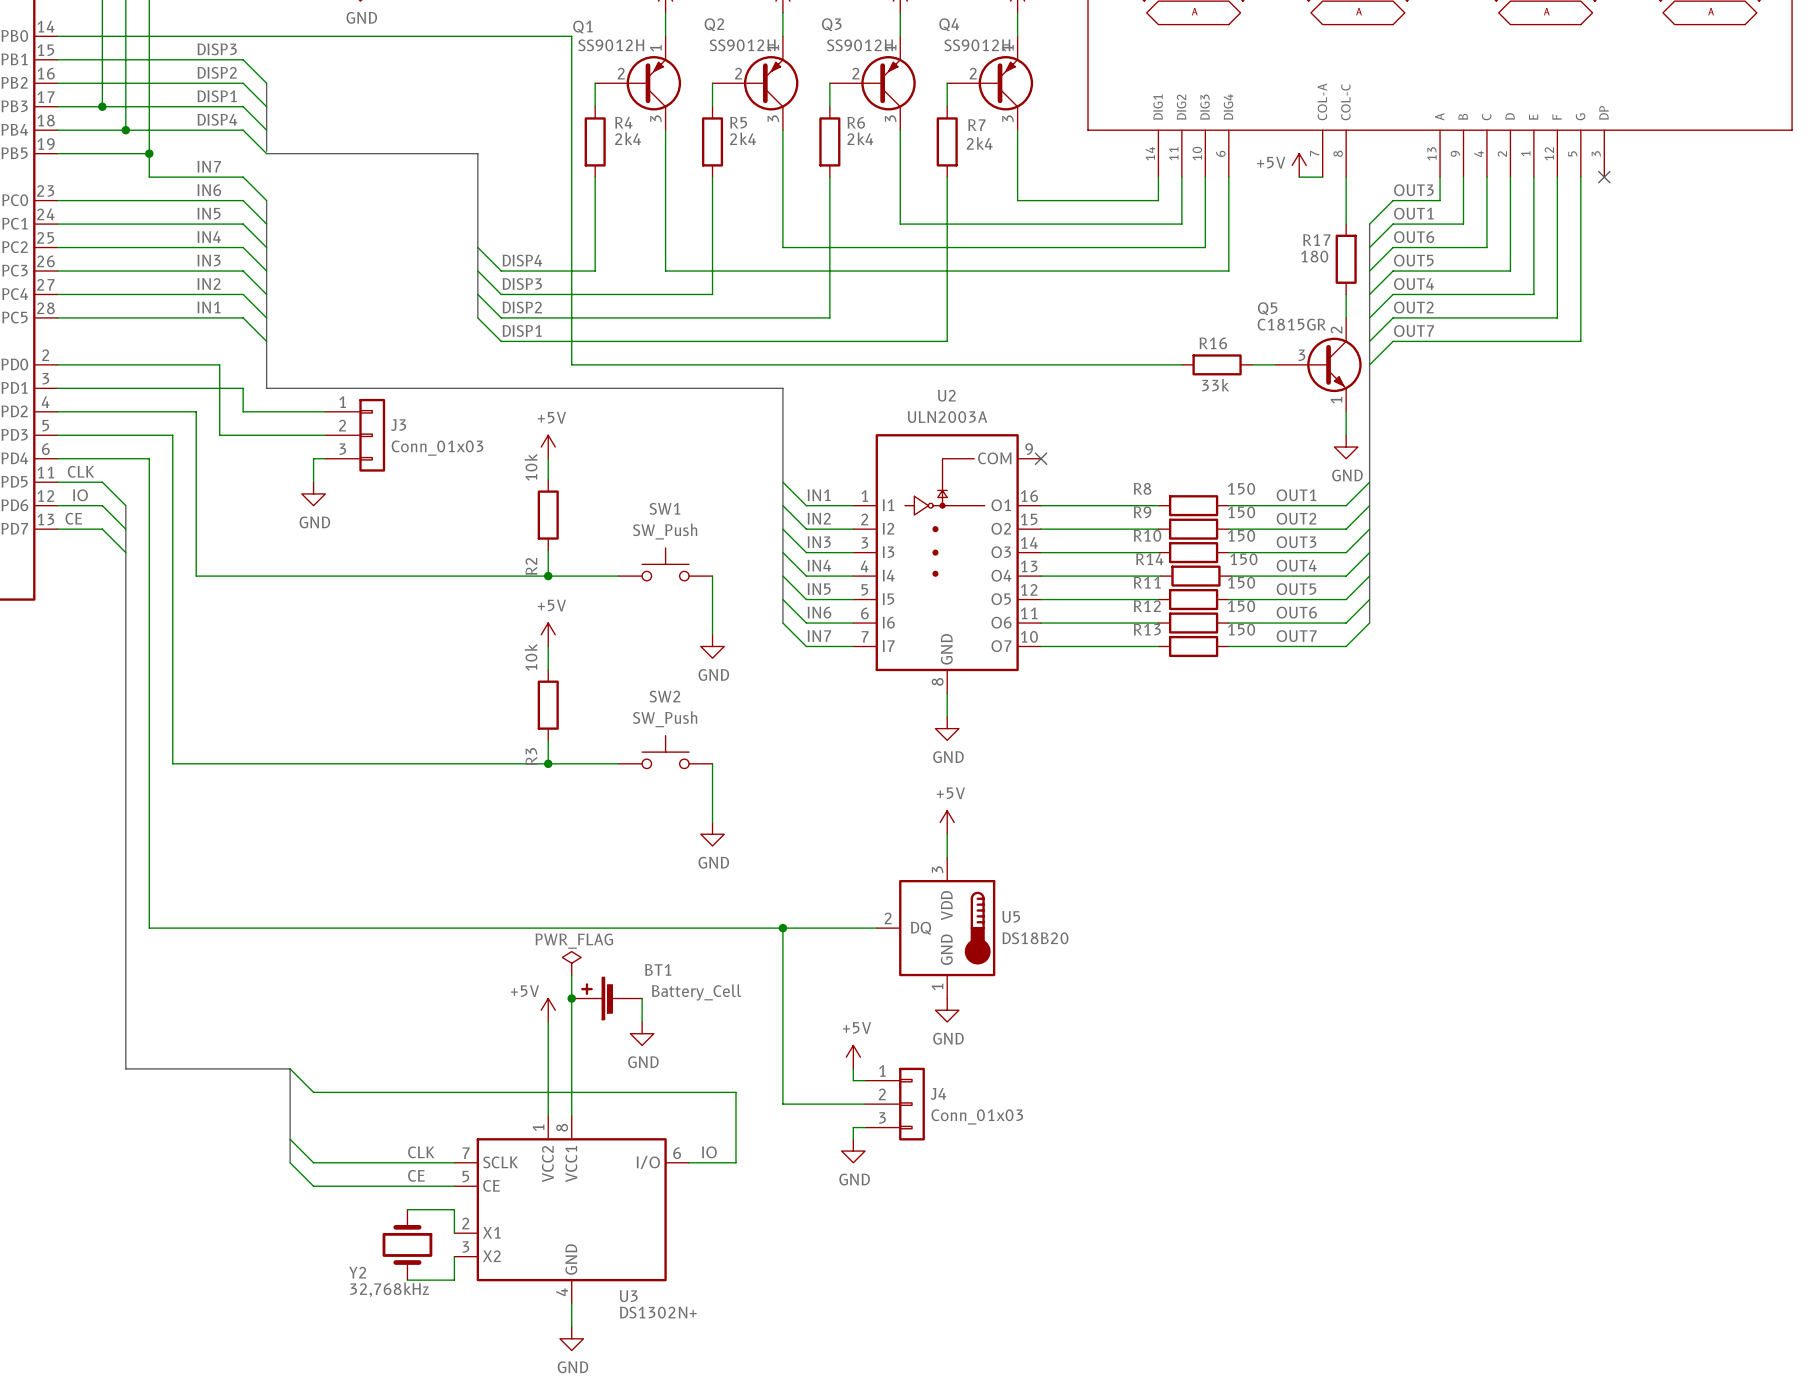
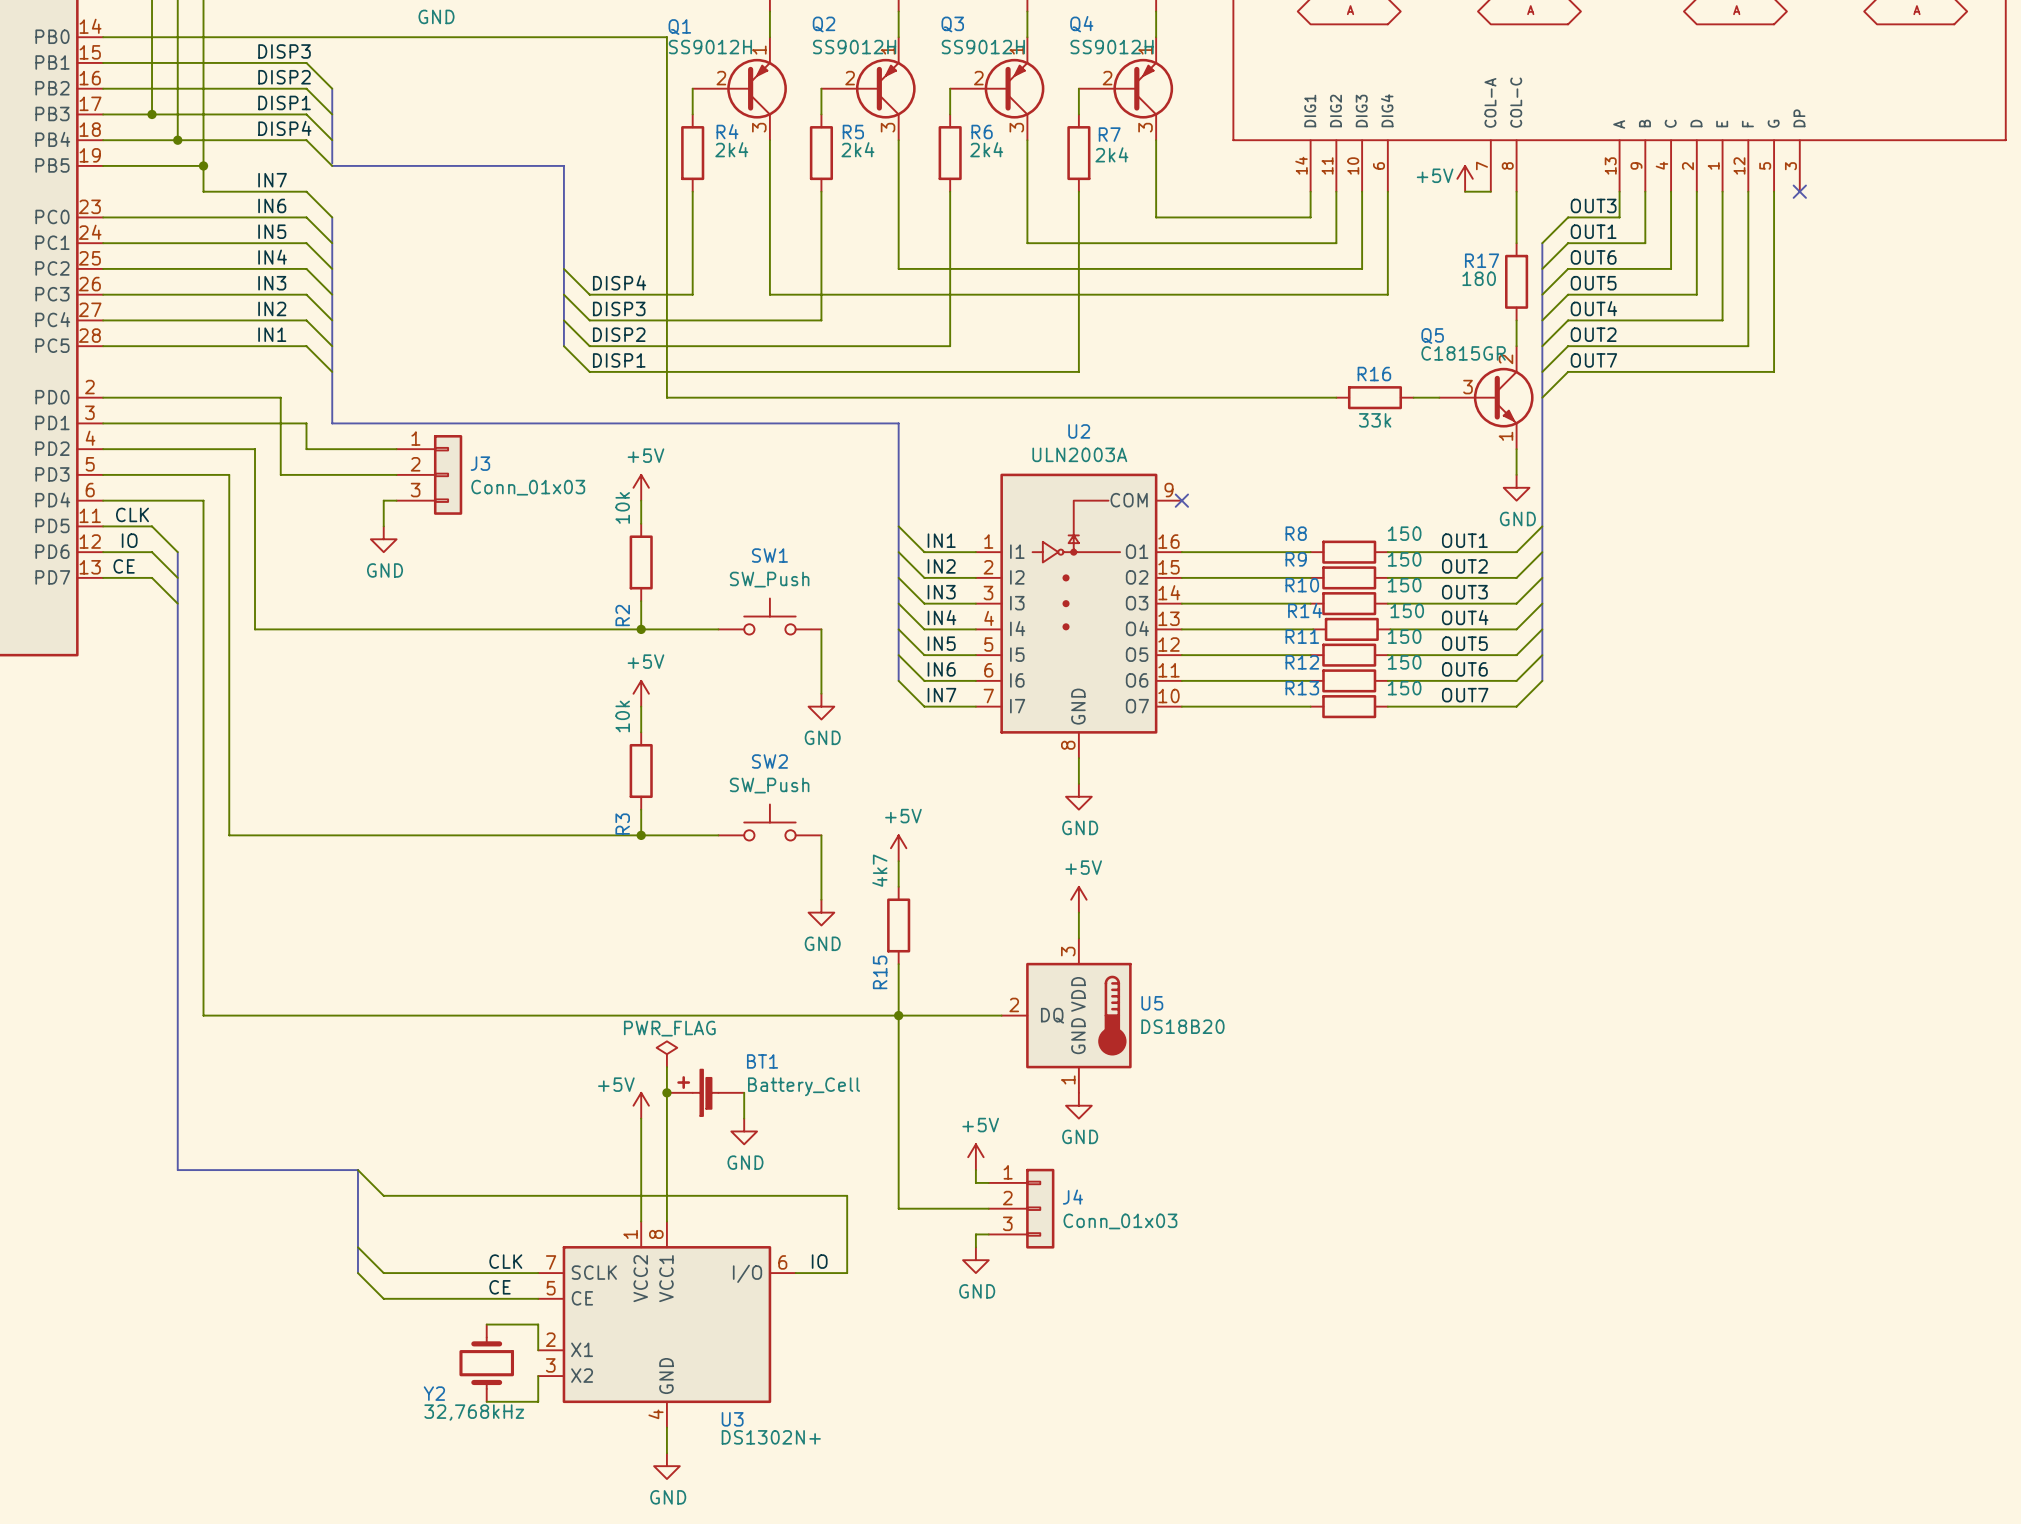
power symbol: none -> +5V (898, 848)
wire: none -> (898, 861) (898, 886)
R15: none -> 4k7 (898, 925)
wire: none -> (898, 964) (898, 1015)

